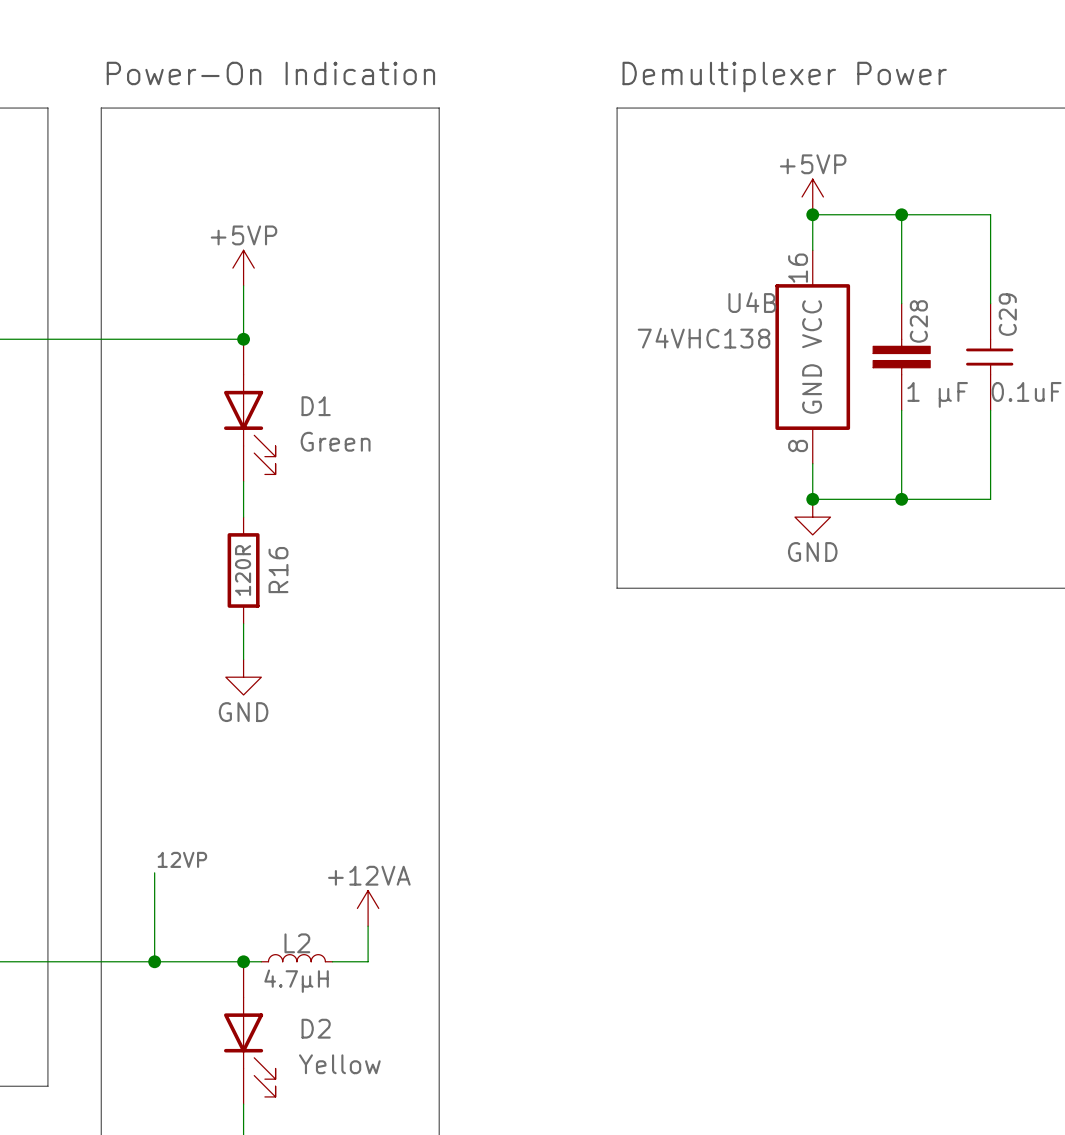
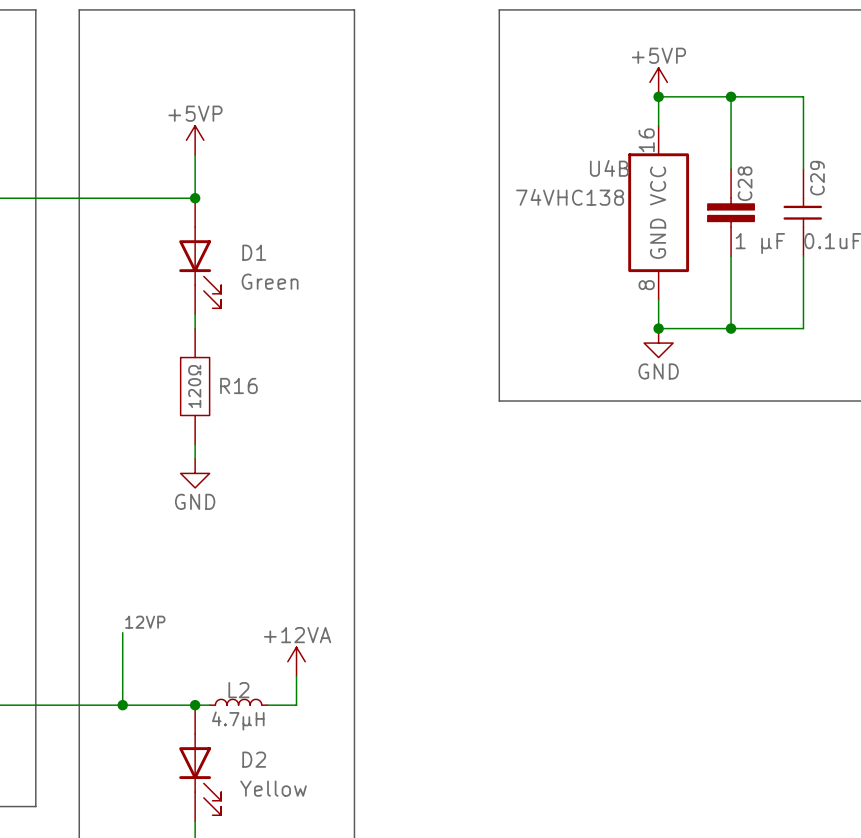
R16 symbol: [227, 517, 260, 624] -> [180, 328, 210, 445]
R16 text: none -> 120Ω (194, 386)
R16 value: 120R (243, 570) -> none

